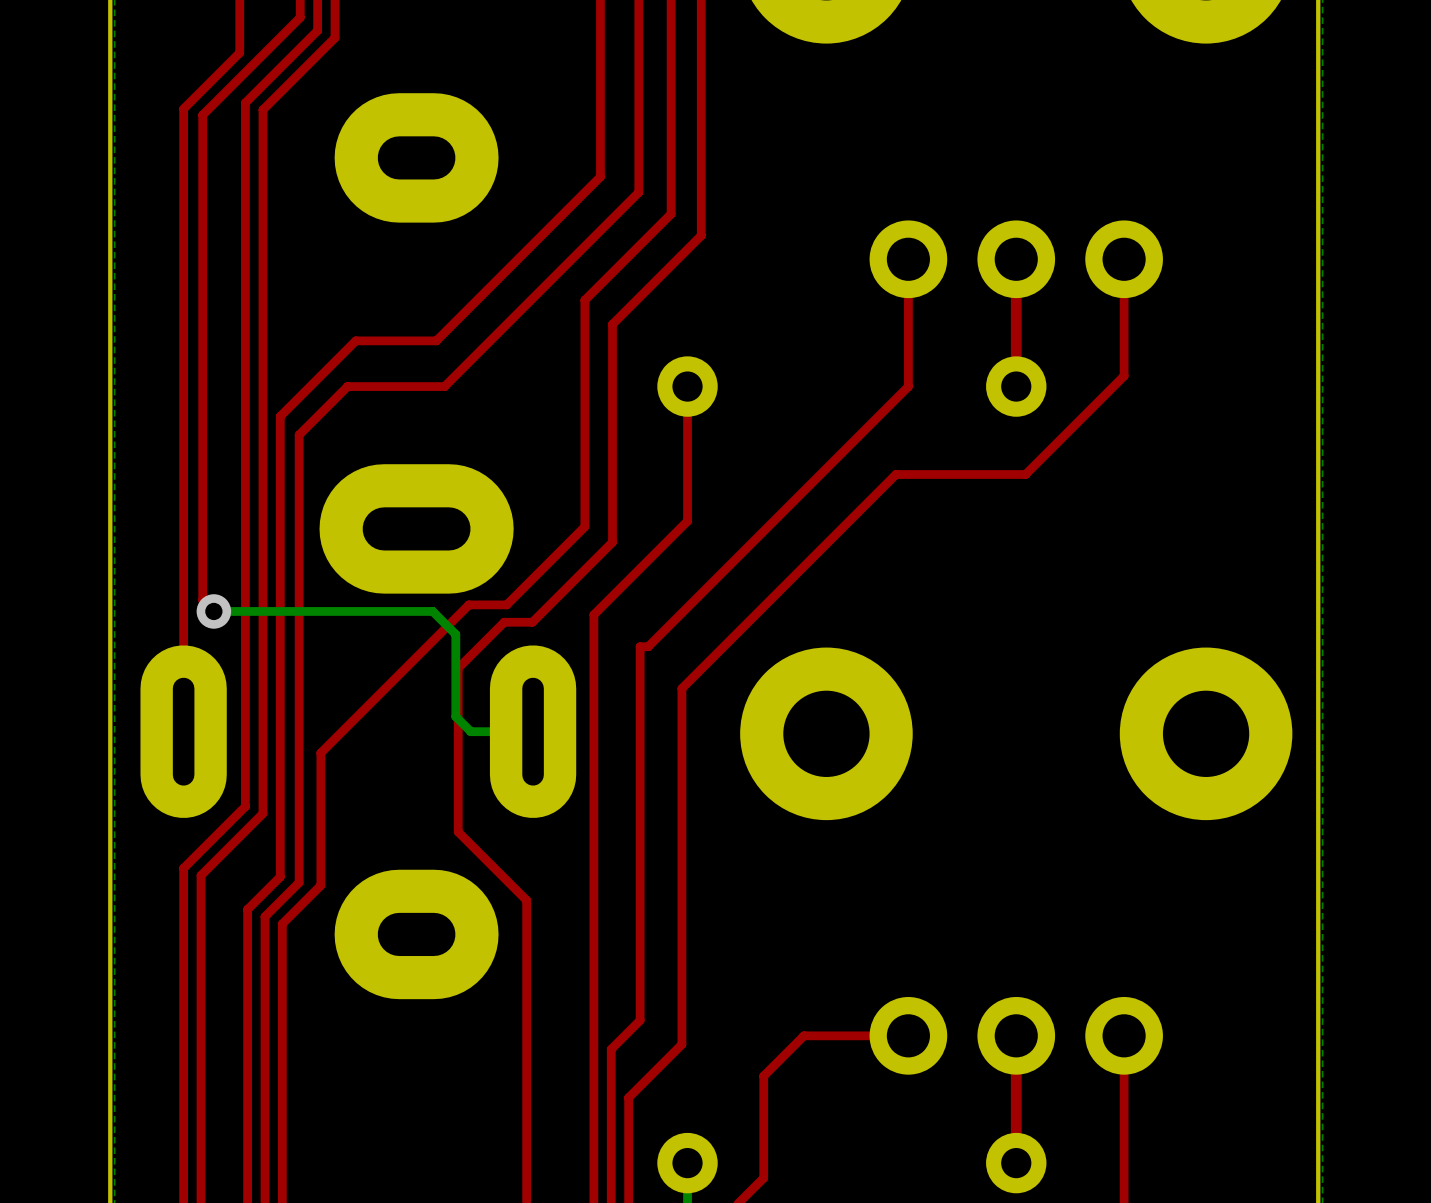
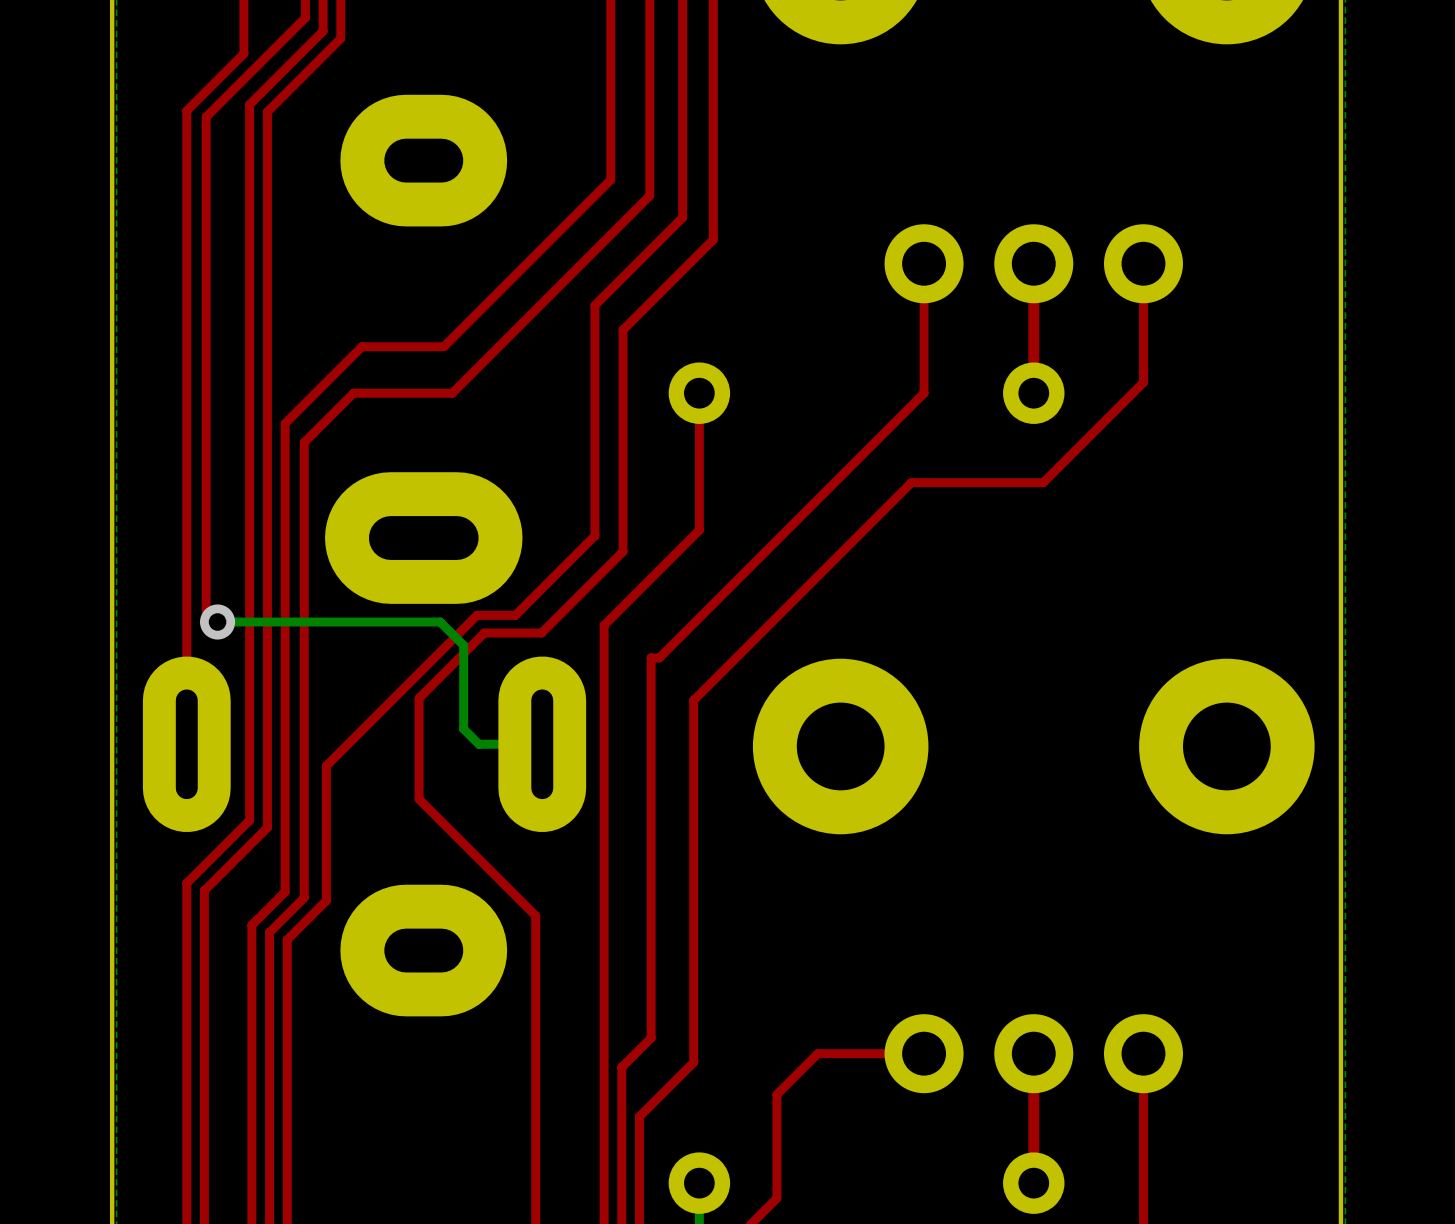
top track: (504, 622) (458, 668) (458, 831) -> (512, 632) (484, 632) (419, 698) (419, 799) (466, 846)

